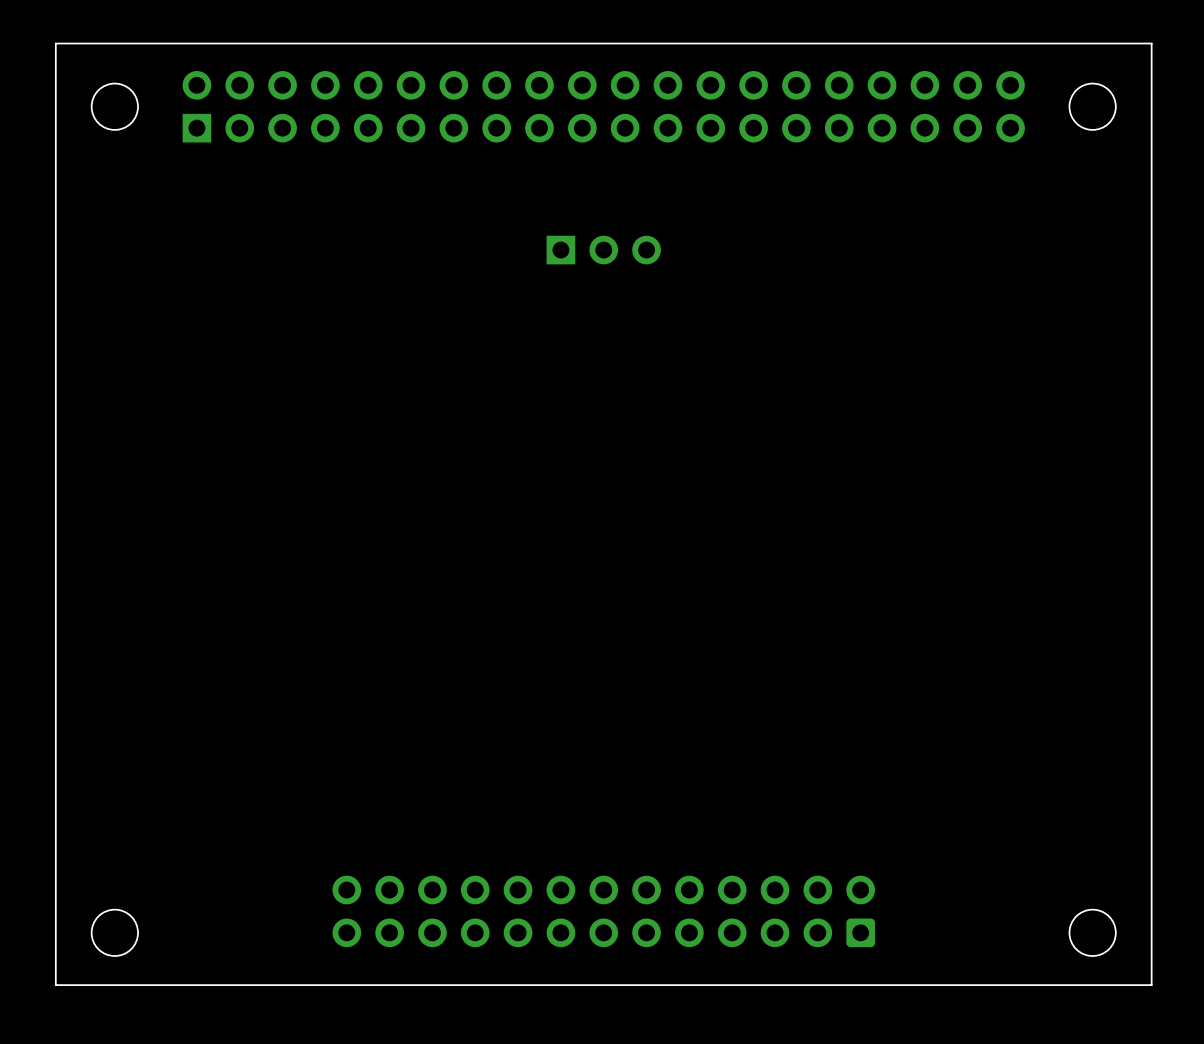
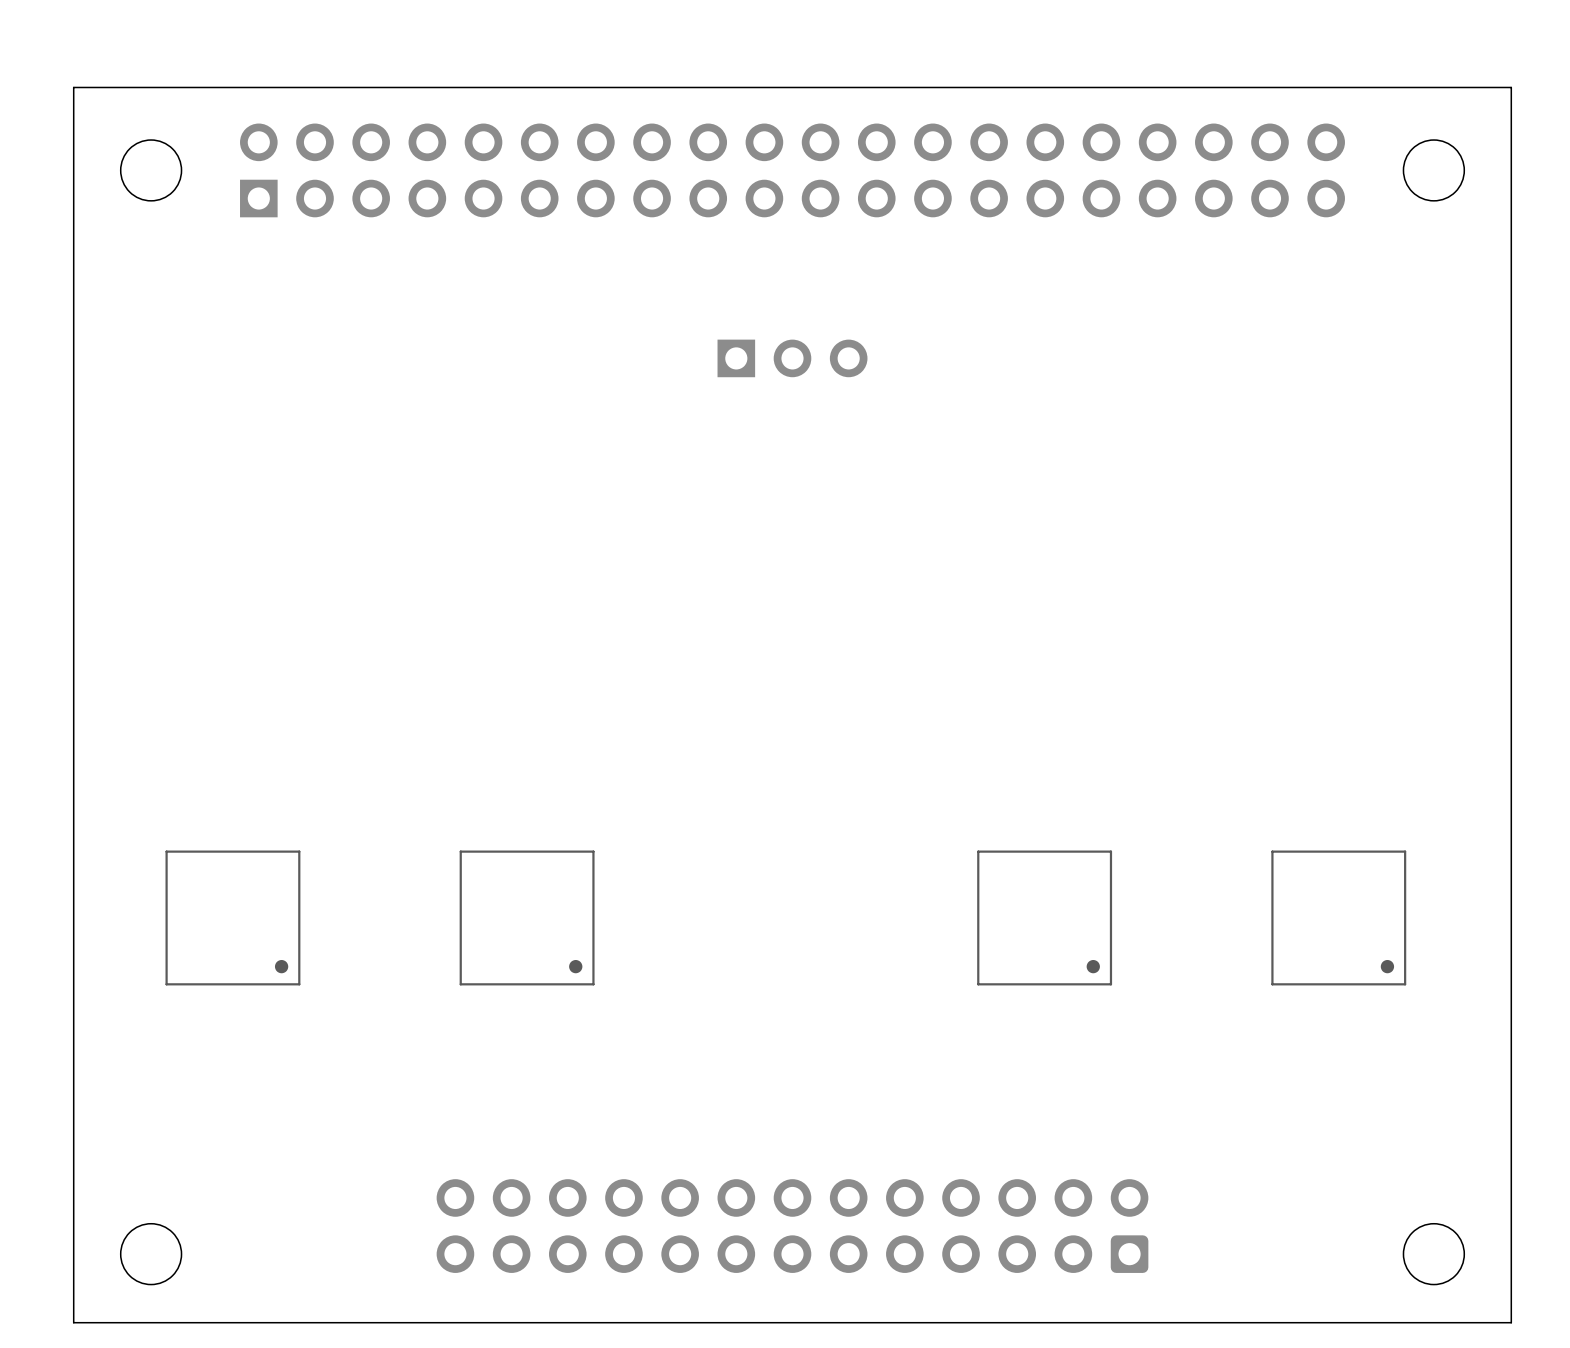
part: none -> (232, 917)
part: none -> (527, 917)
part: none -> (1044, 917)
part: none -> (1338, 917)

